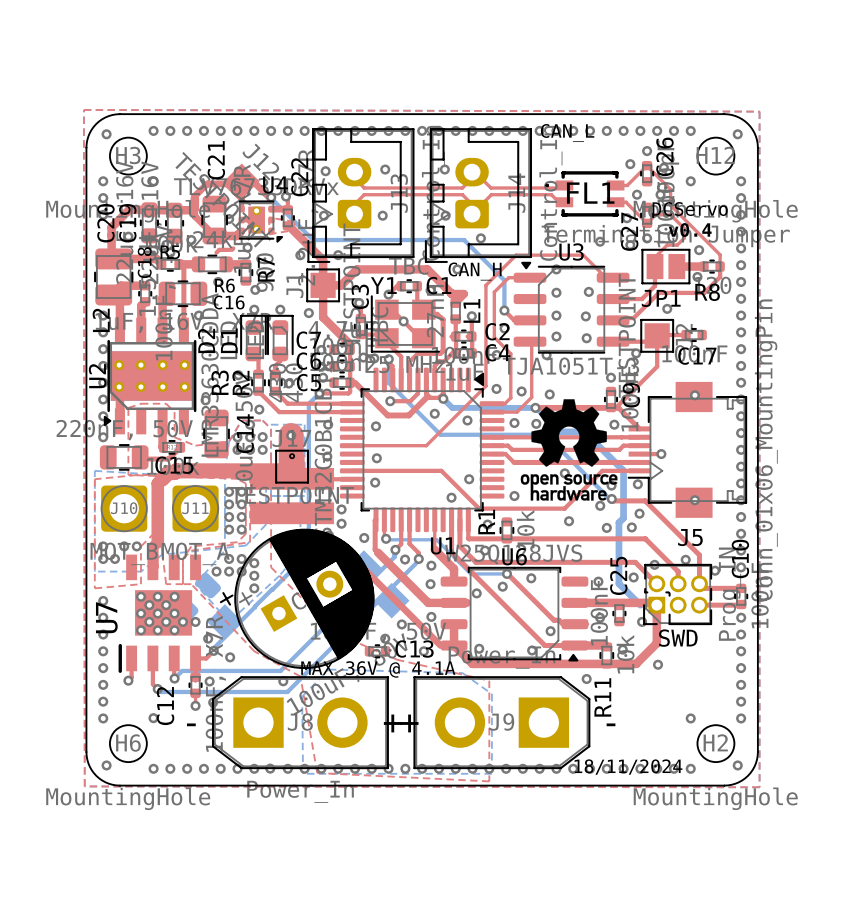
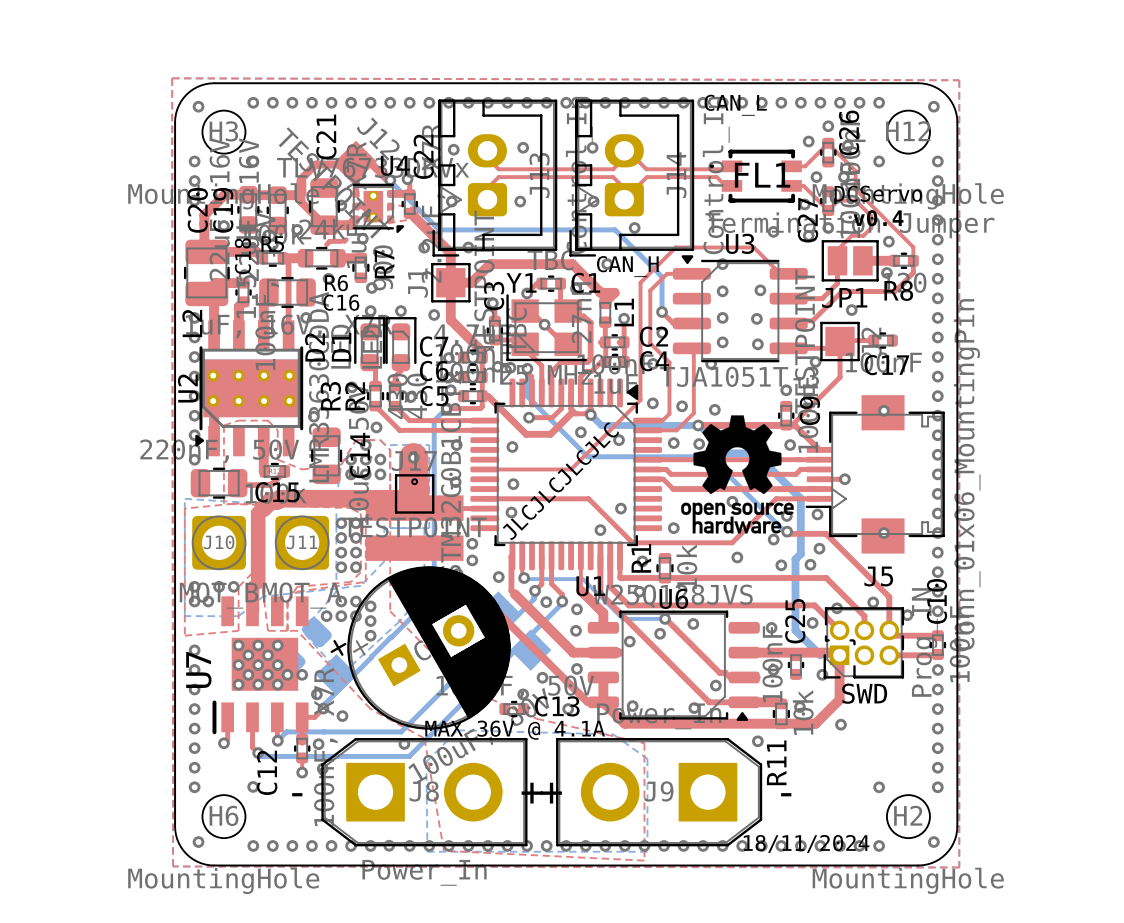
text: none -> JLCJLCJLCJLC (560, 481)

